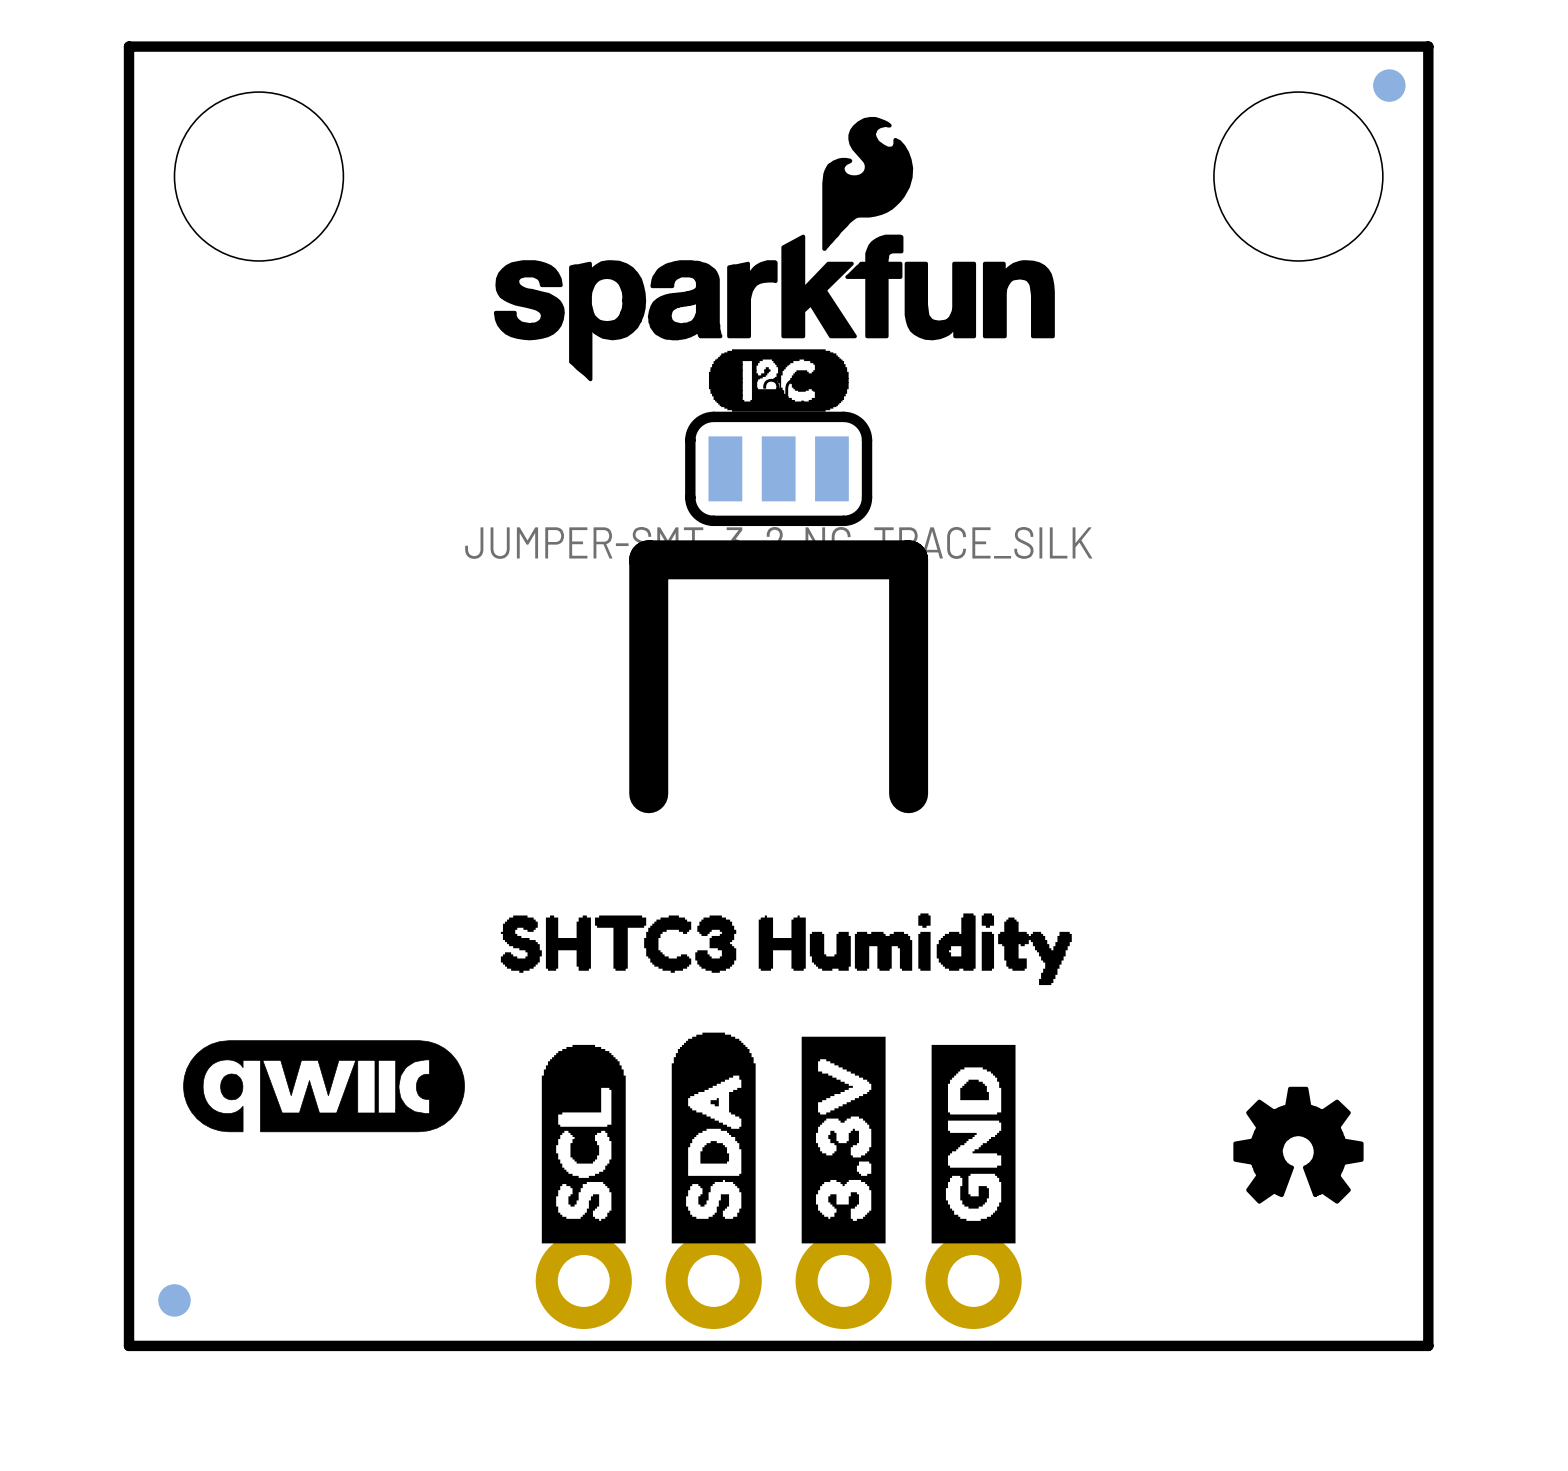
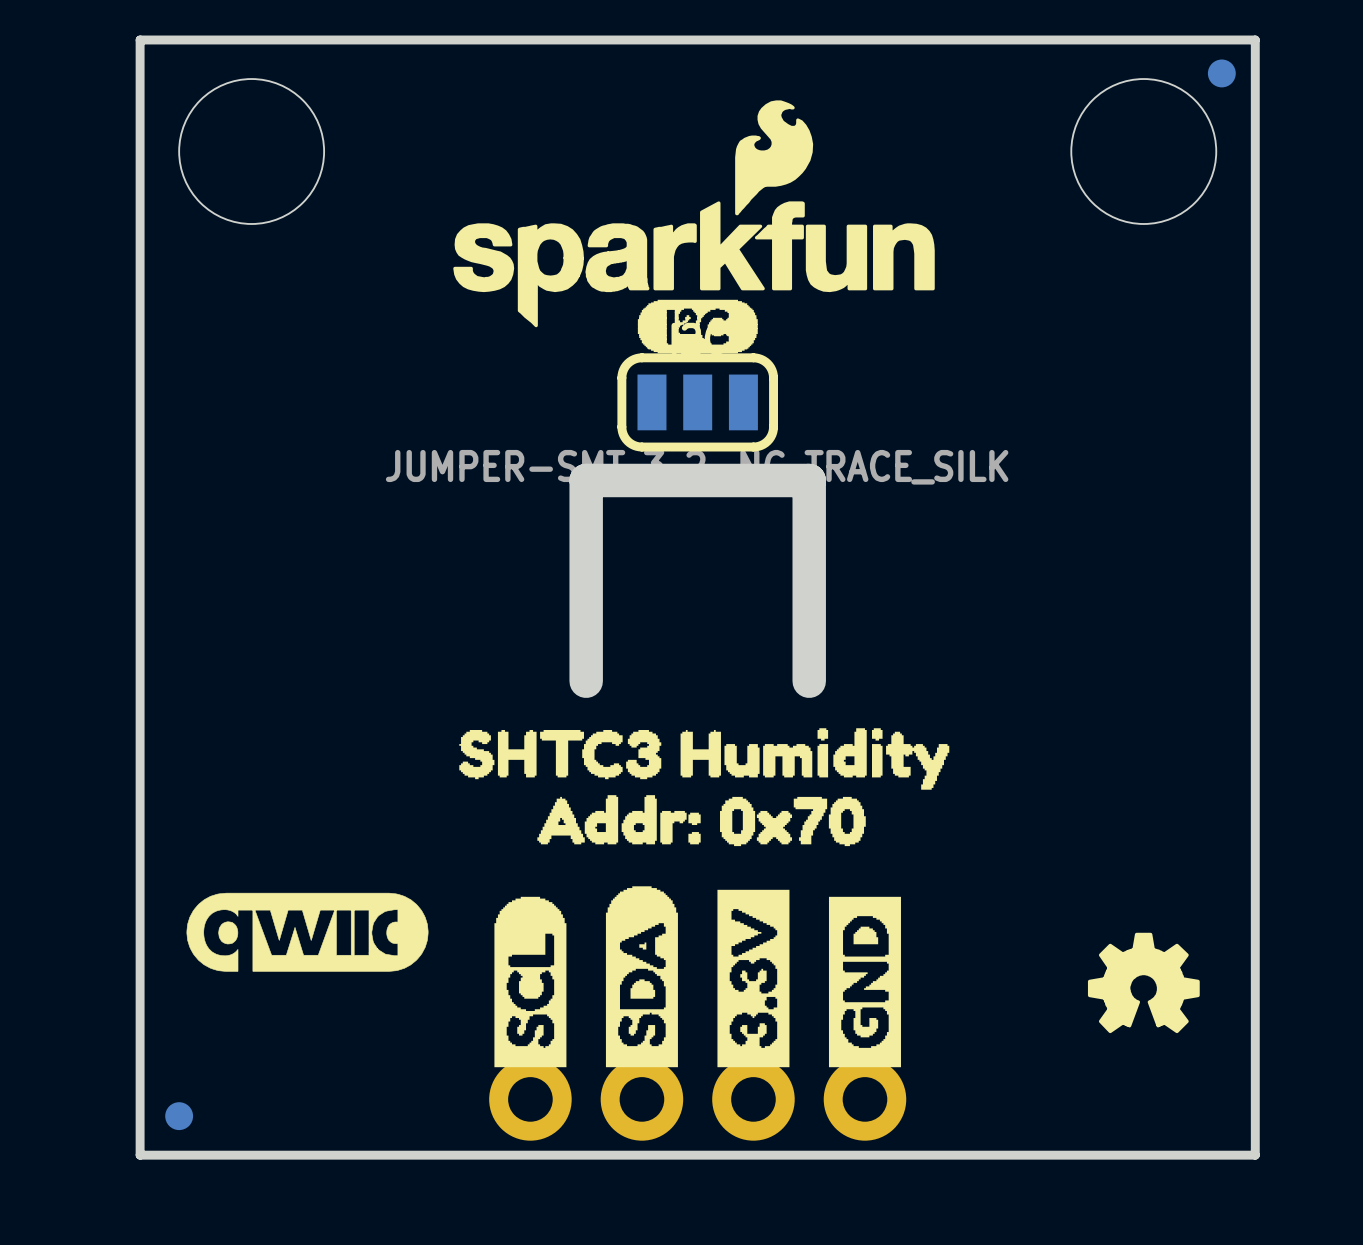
drawing: none -> [537, 795, 866, 847]
drawing position: (786, 949) -> (704, 758)

